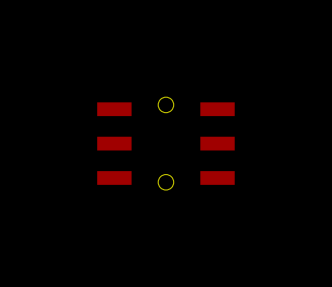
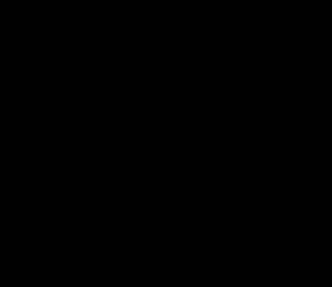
part: (165, 143) -> none

